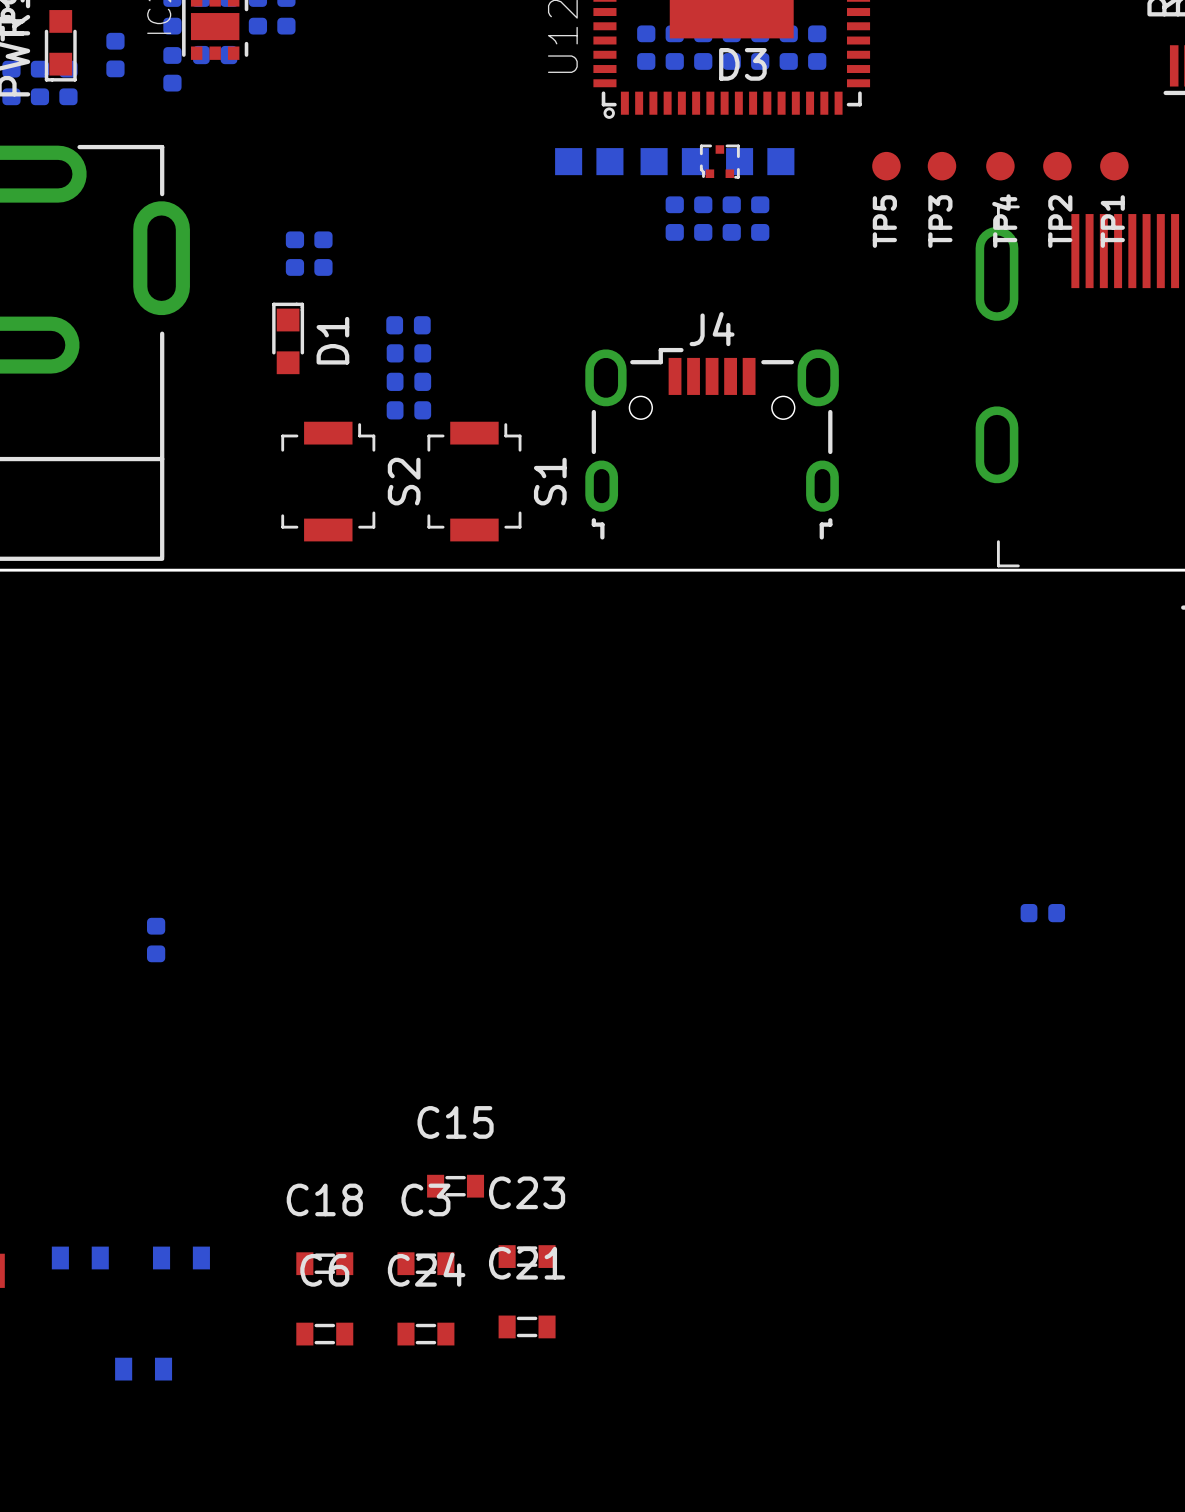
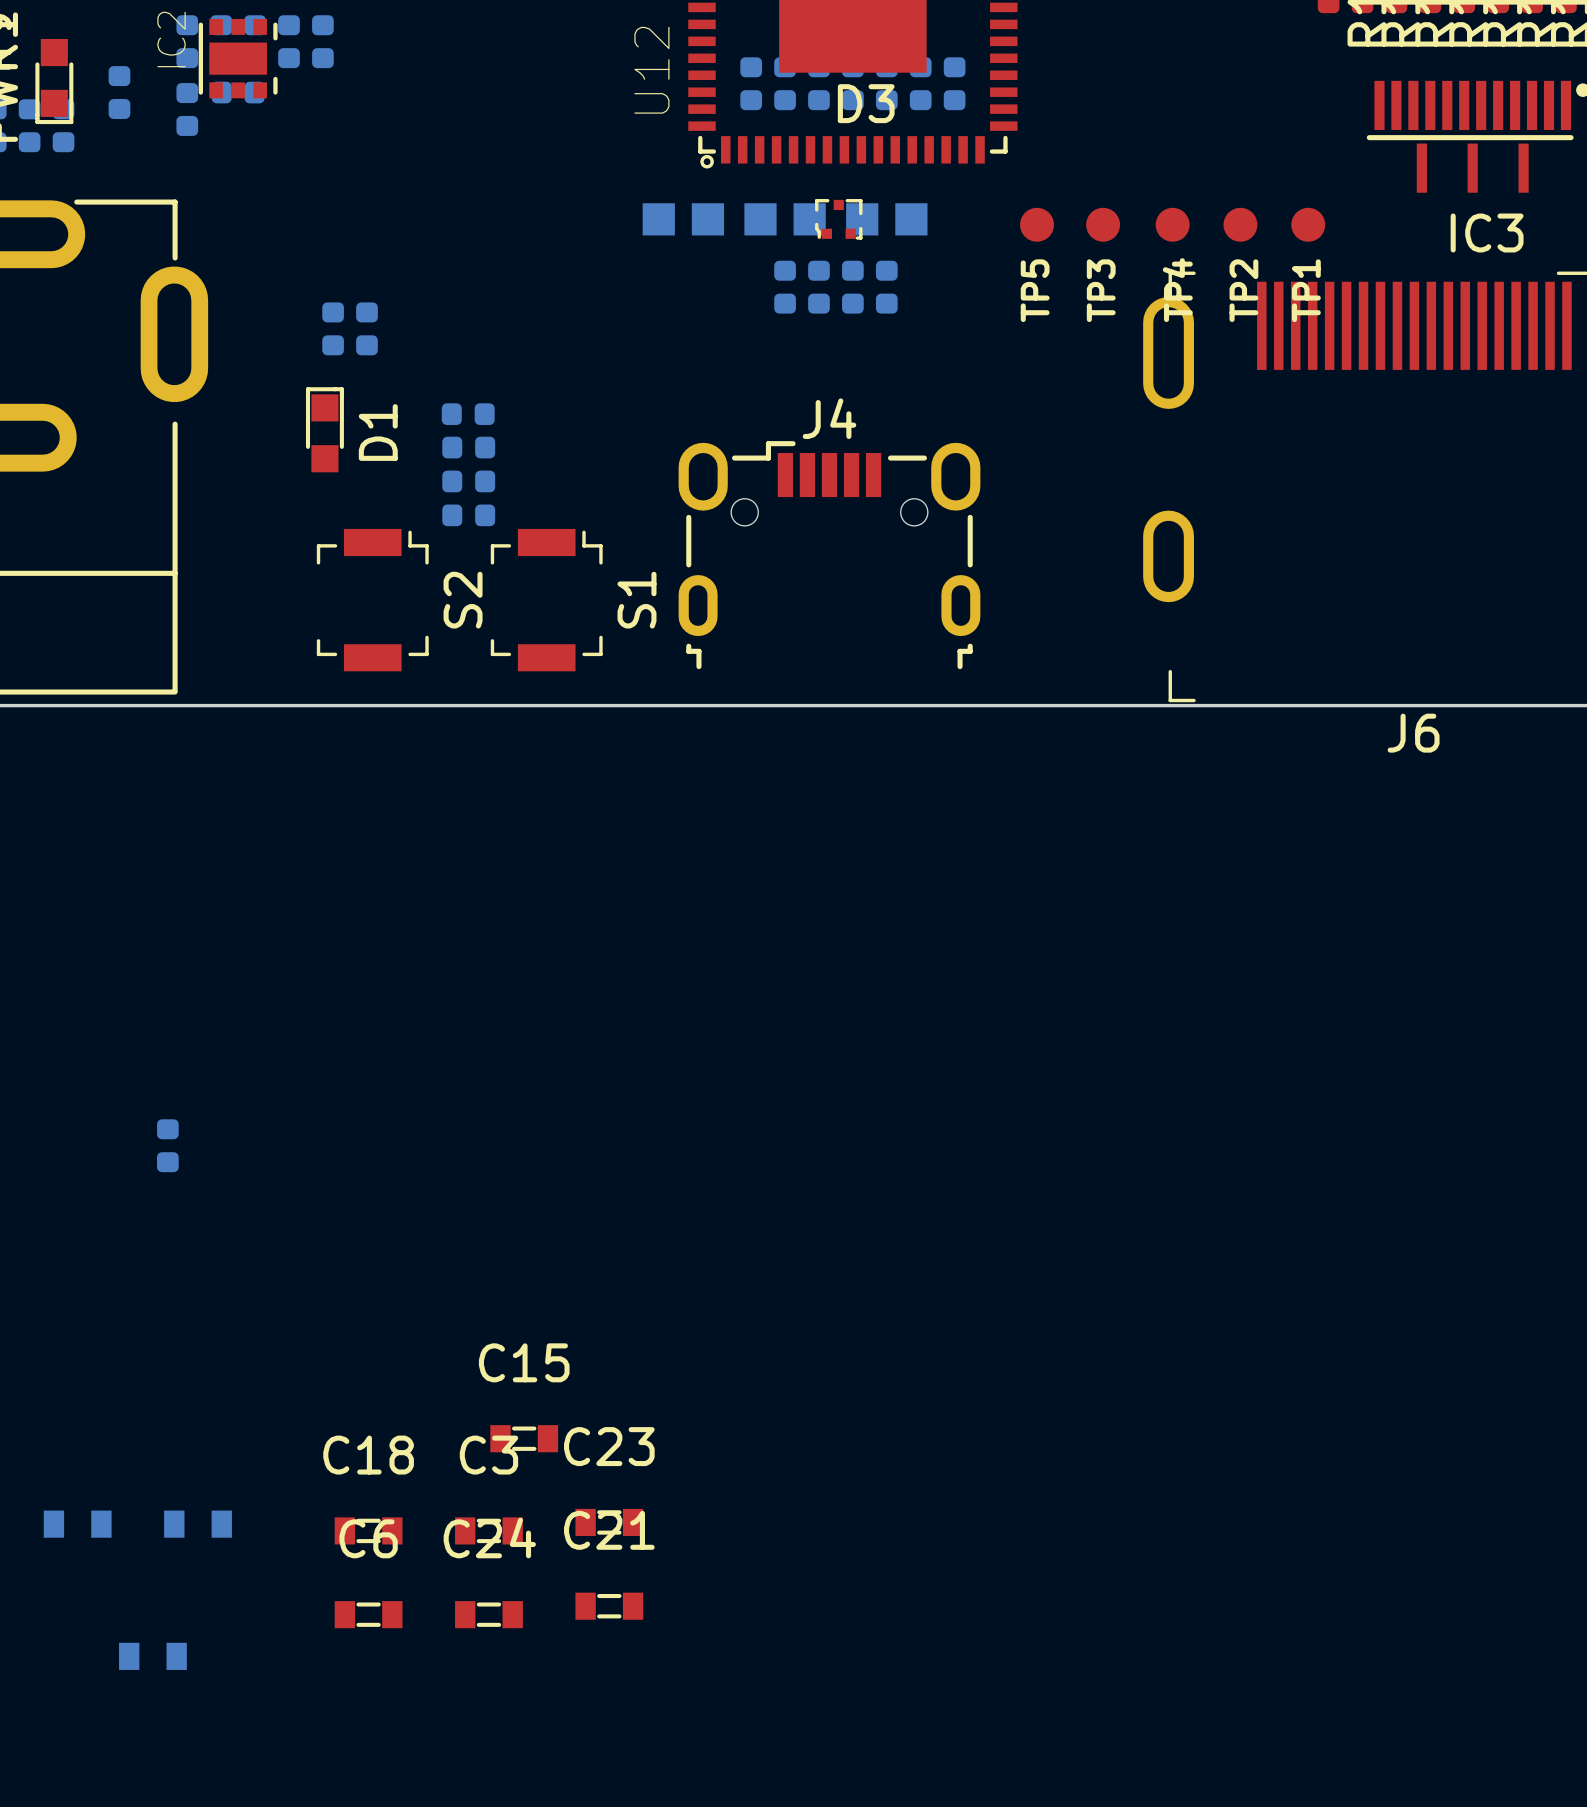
part: (1042, 913) -> none

